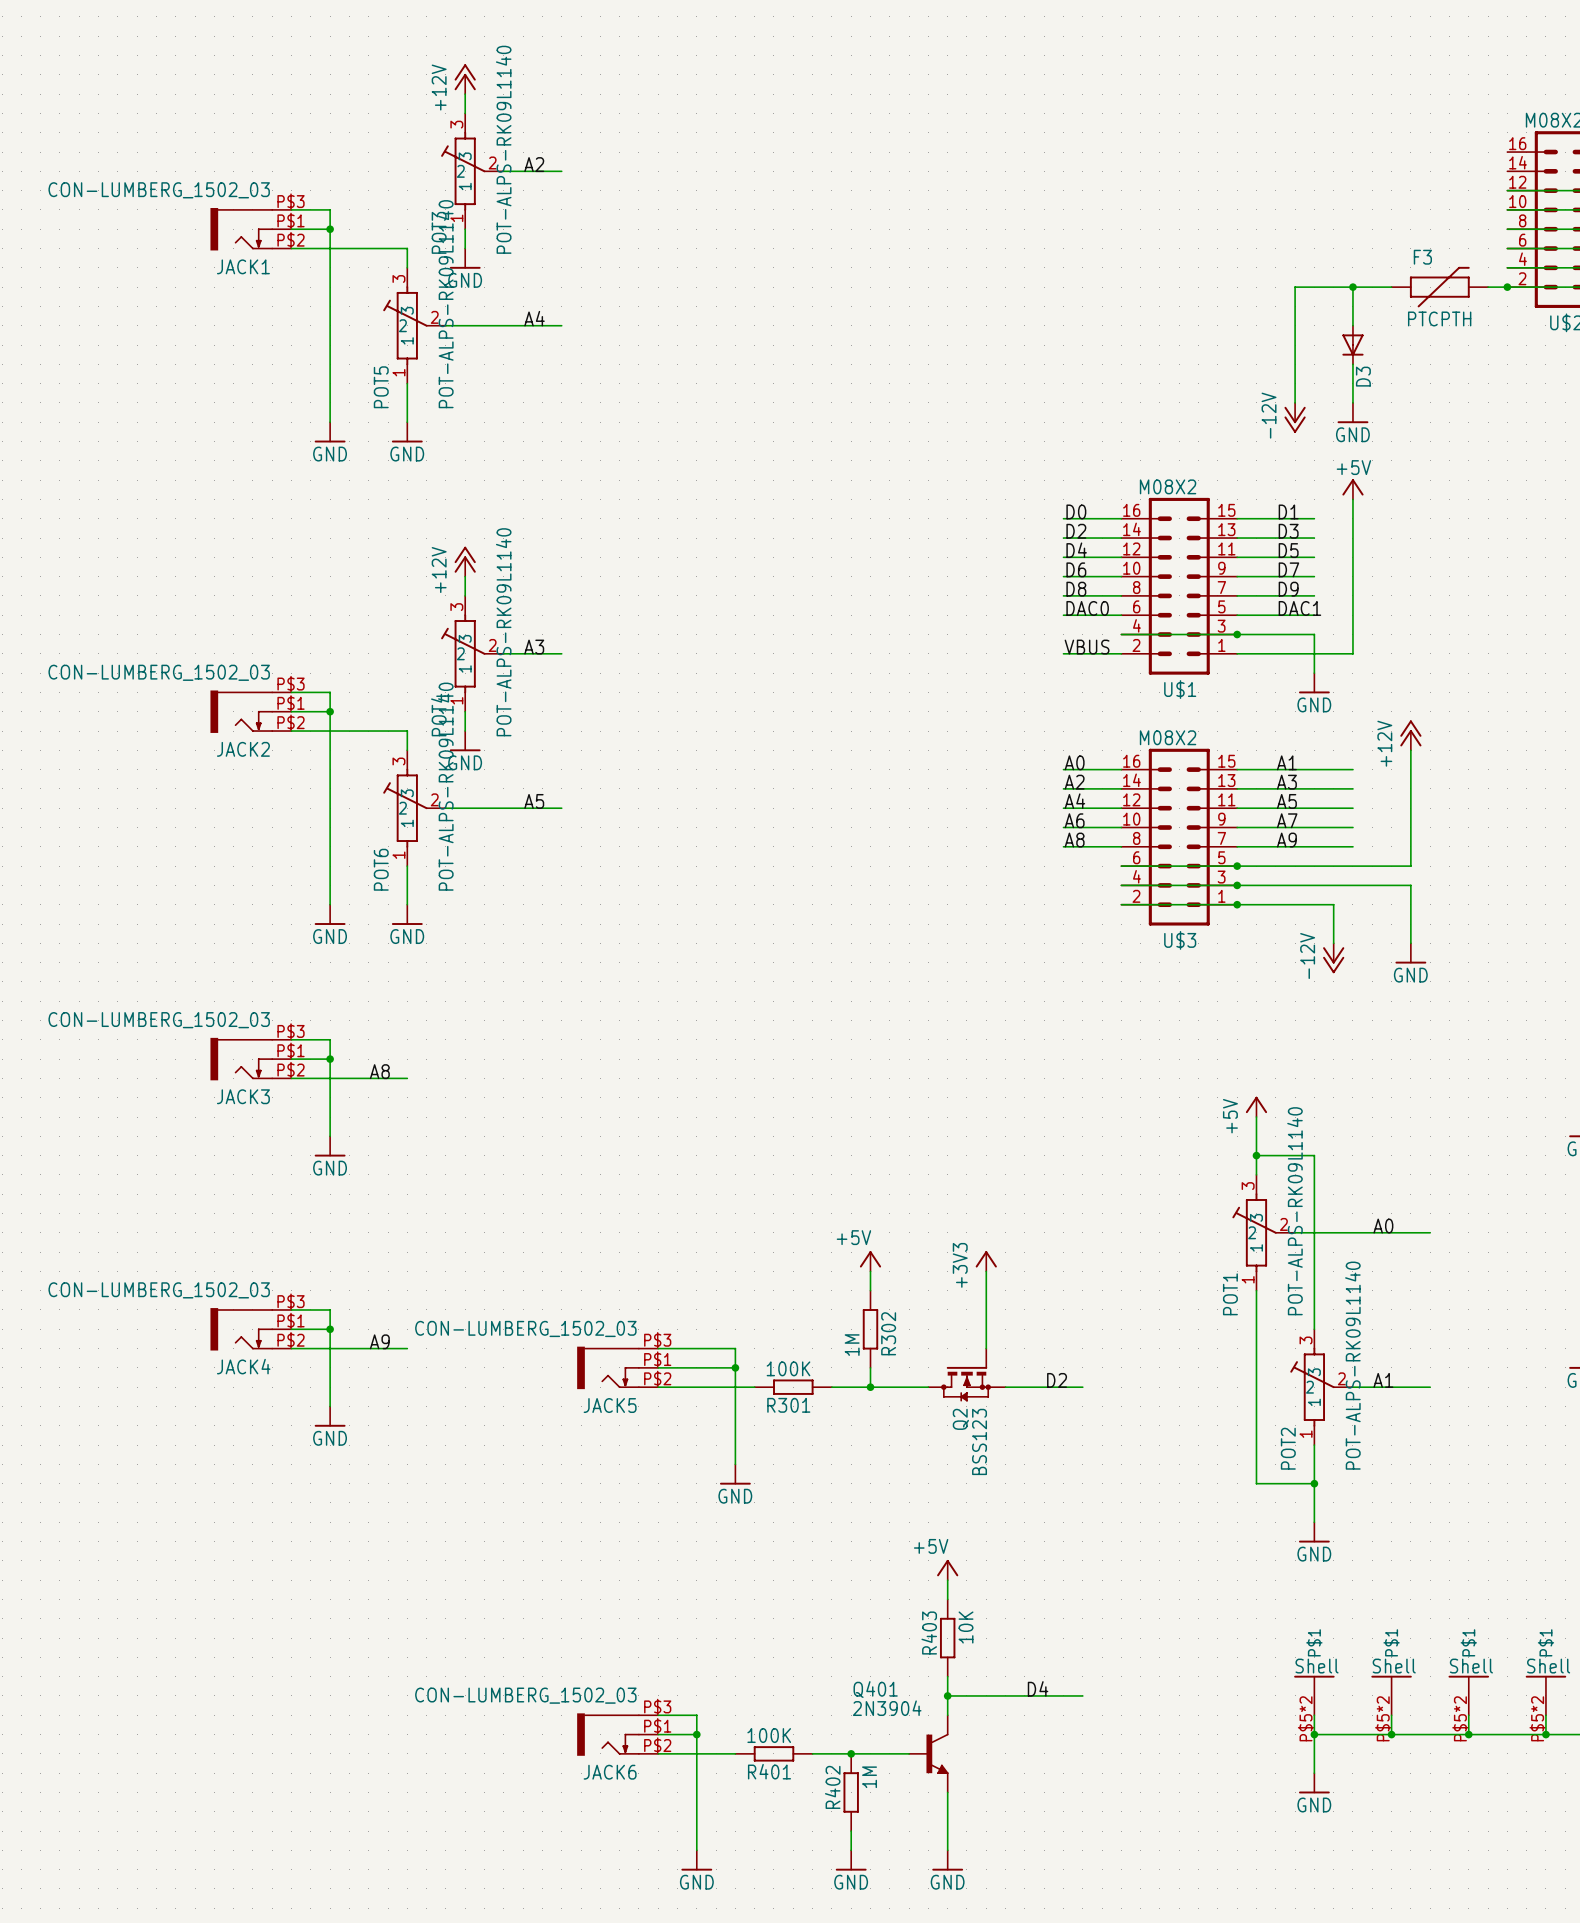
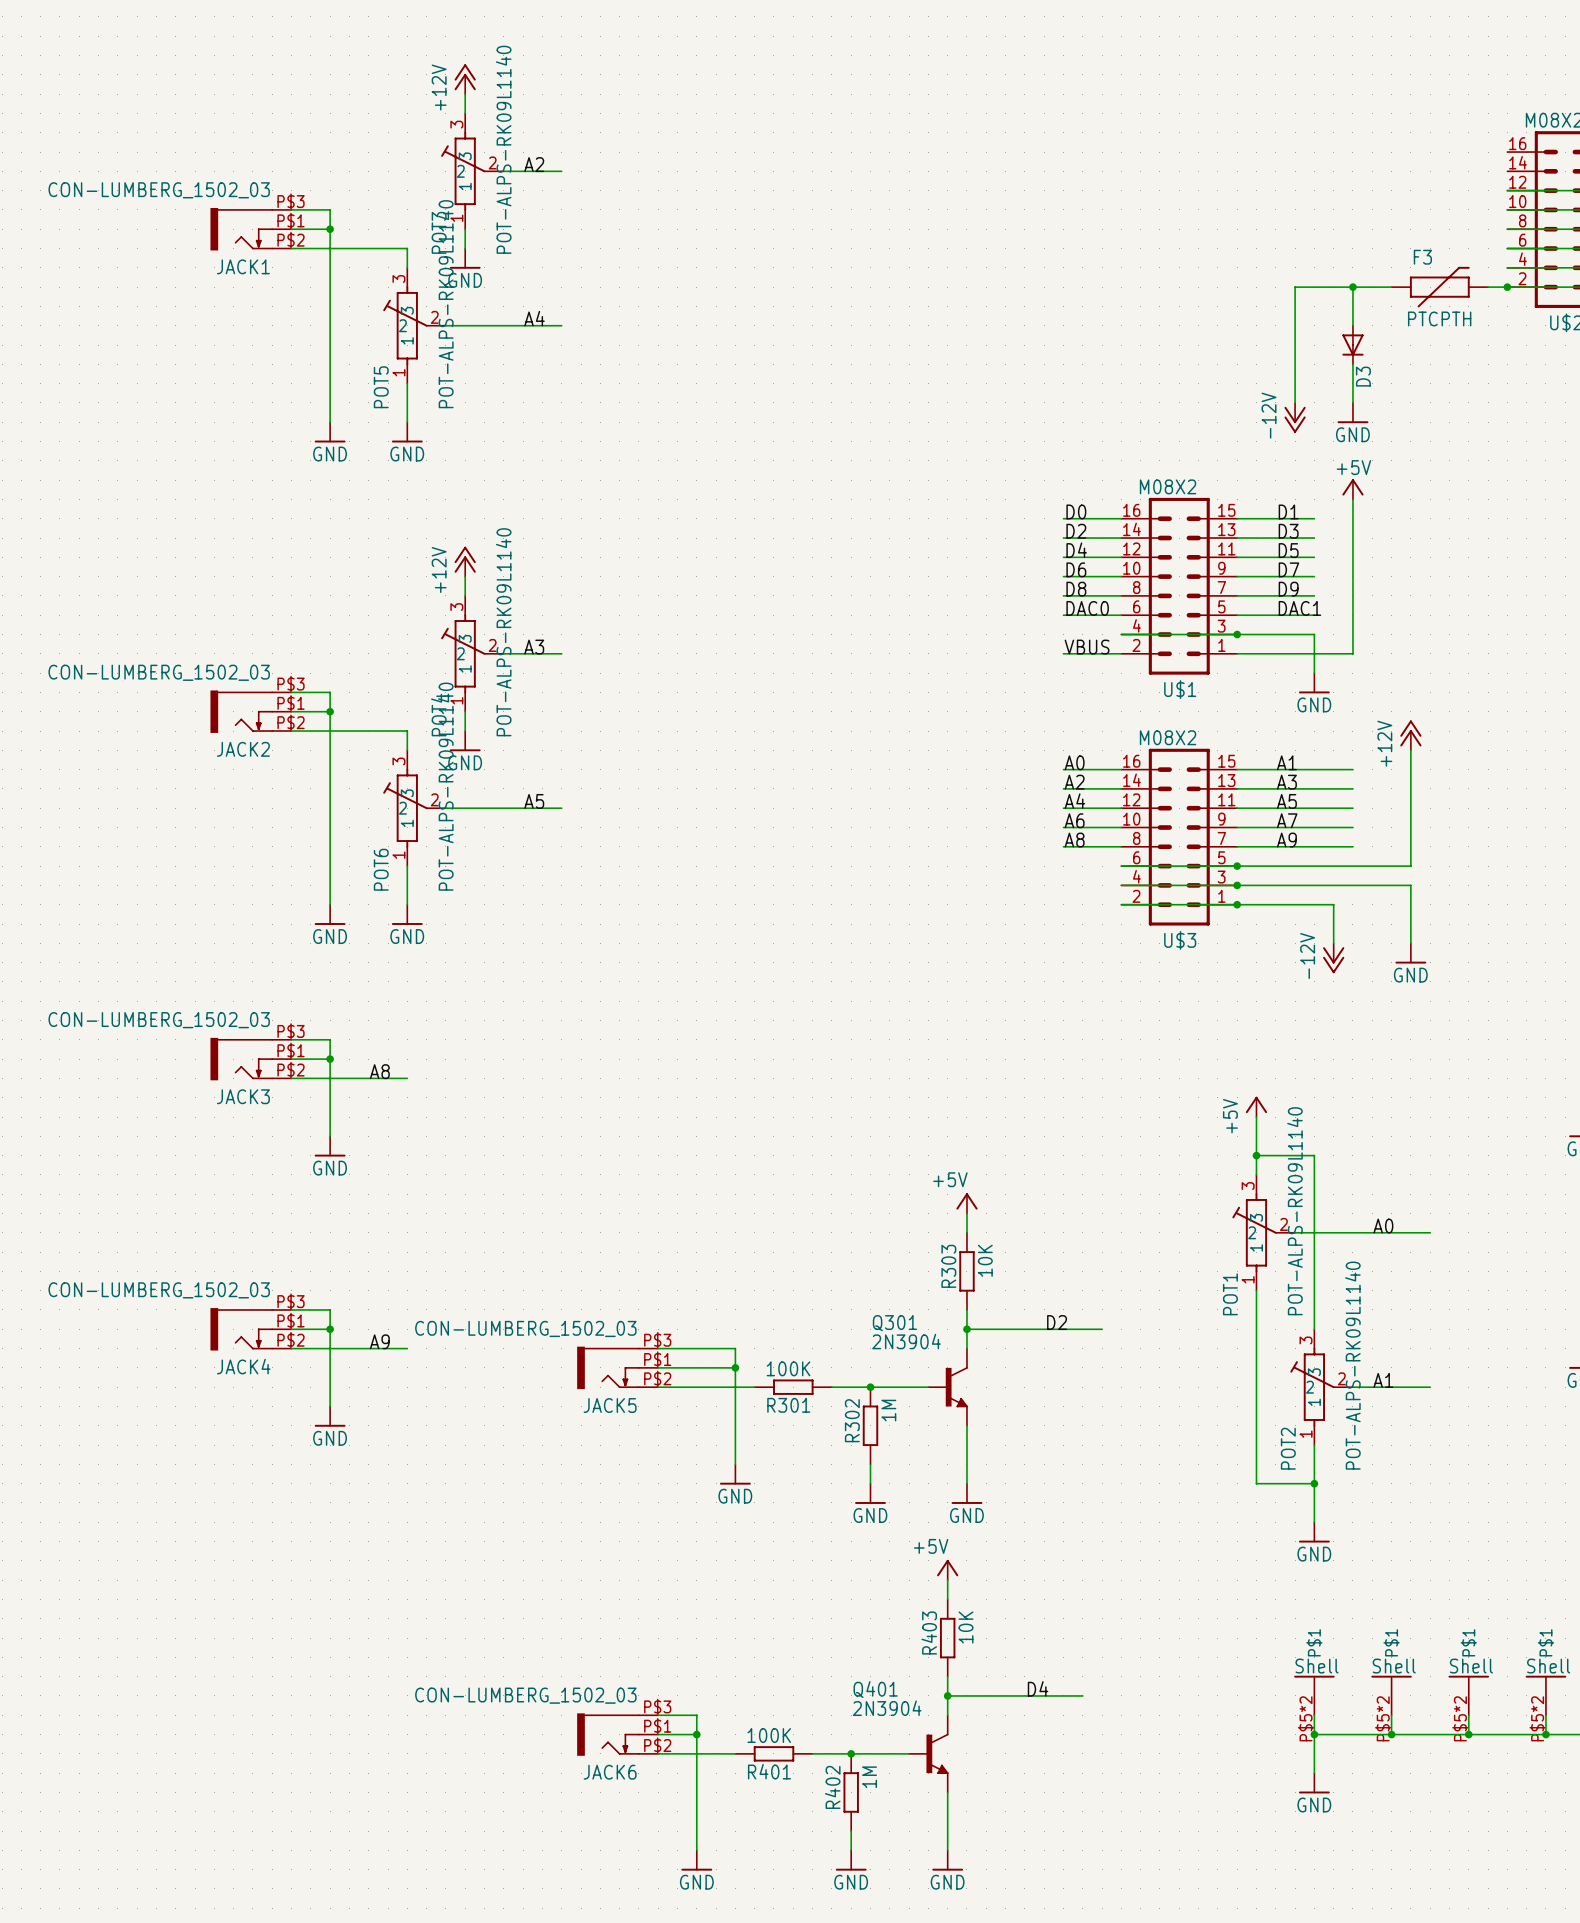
power symbol position: +5V (870, 1261) -> +5V (966, 1203)
power symbol: +3V3 (986, 1261) -> none
wire: (870, 1271) (870, 1290) -> (966, 1213) (966, 1232)
R303: none -> 10K (966, 1271)
wire: (986, 1271) (986, 1348) -> none
wire: none -> (966, 1309) (966, 1348)
R302 position: (870, 1329) -> (870, 1425)
wire: none -> (966, 1329) (1102, 1329)
junction: none -> (966, 1329)
R302 name position: R302 (888, 1333) -> R302 (852, 1420)
R302 value position: 1M (852, 1345) -> 1M (888, 1410)
wire: (870, 1367) (870, 1387) -> (870, 1464) (870, 1483)
Q2: BSS123 (966, 1374) -> none
label position: D2 (1057, 1380) -> D2 (1057, 1322)
Q301: none -> 2N3904 (947, 1387)
wire: (1005, 1387) (1082, 1387) -> none
wire: none -> (966, 1425) (966, 1483)
power symbol: none -> GND (870, 1493)
power symbol: none -> GND (966, 1493)

